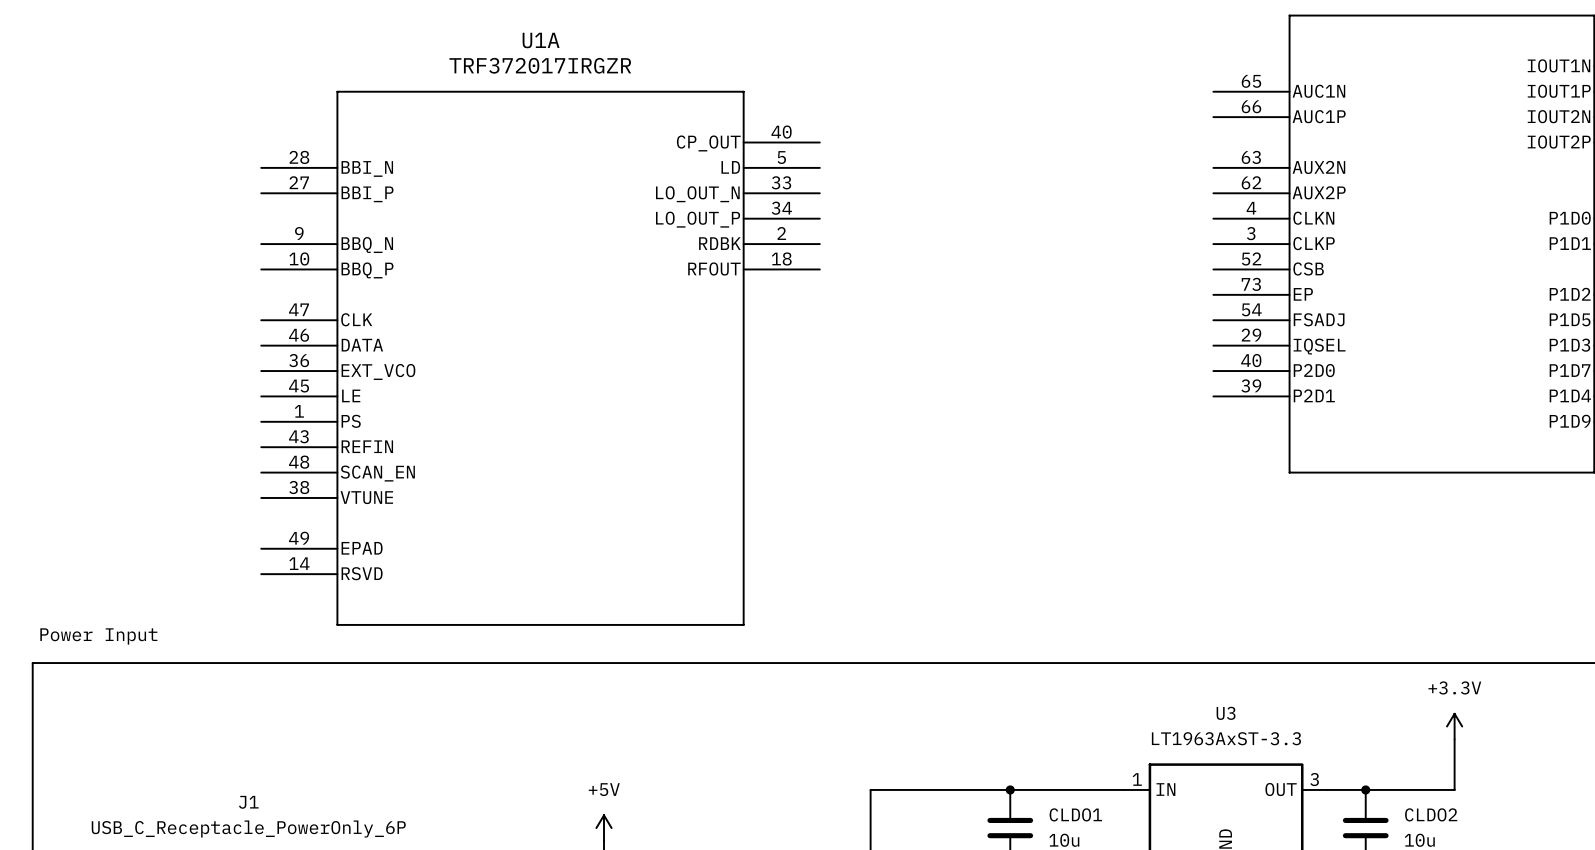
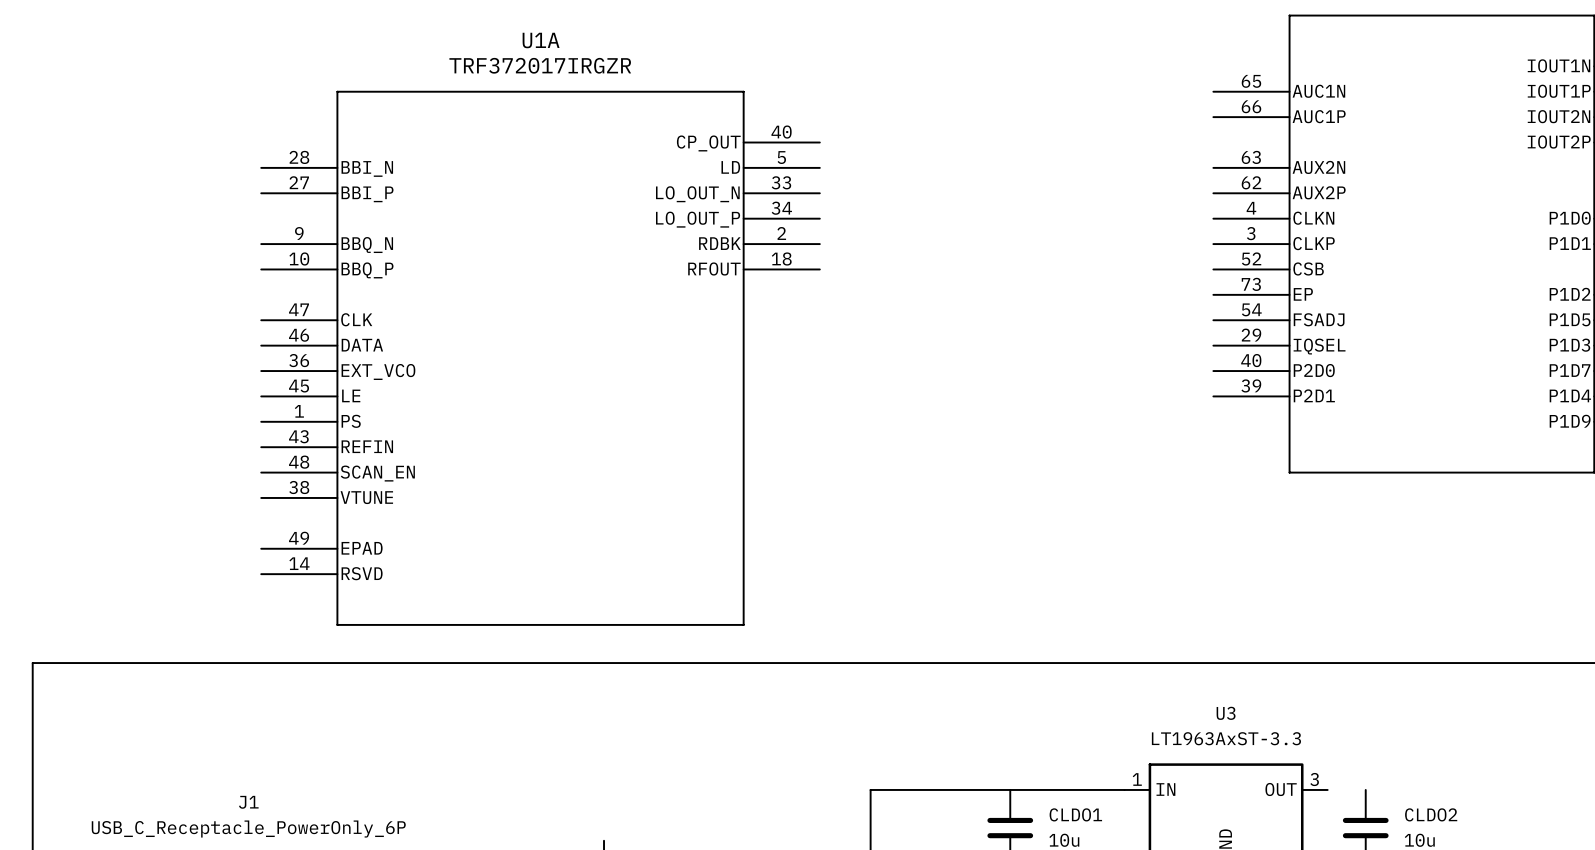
text: Power Input (98, 636) -> none
power symbol: +3.3V (1454, 726) -> none
wire: (1454, 739) (1454, 789) (1327, 789) -> none
junction: (1010, 789) -> none
junction: (1365, 789) -> none
power symbol: +5V (604, 828) -> none

